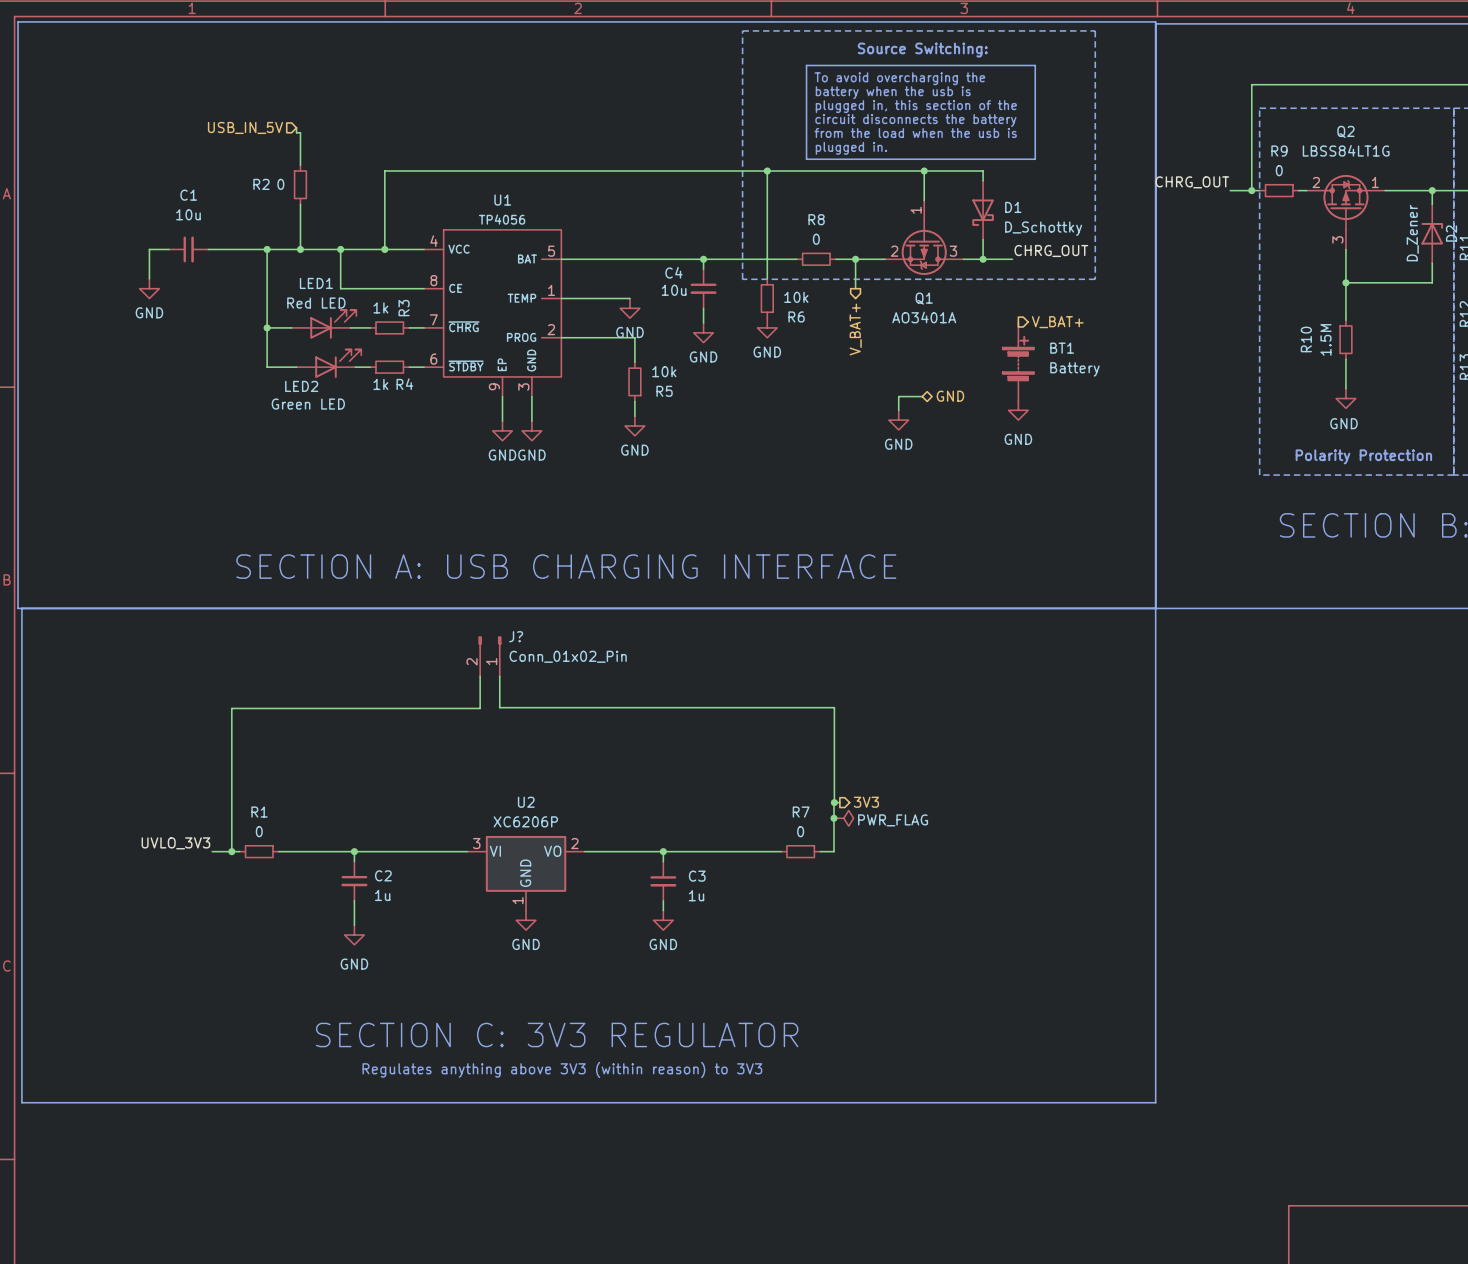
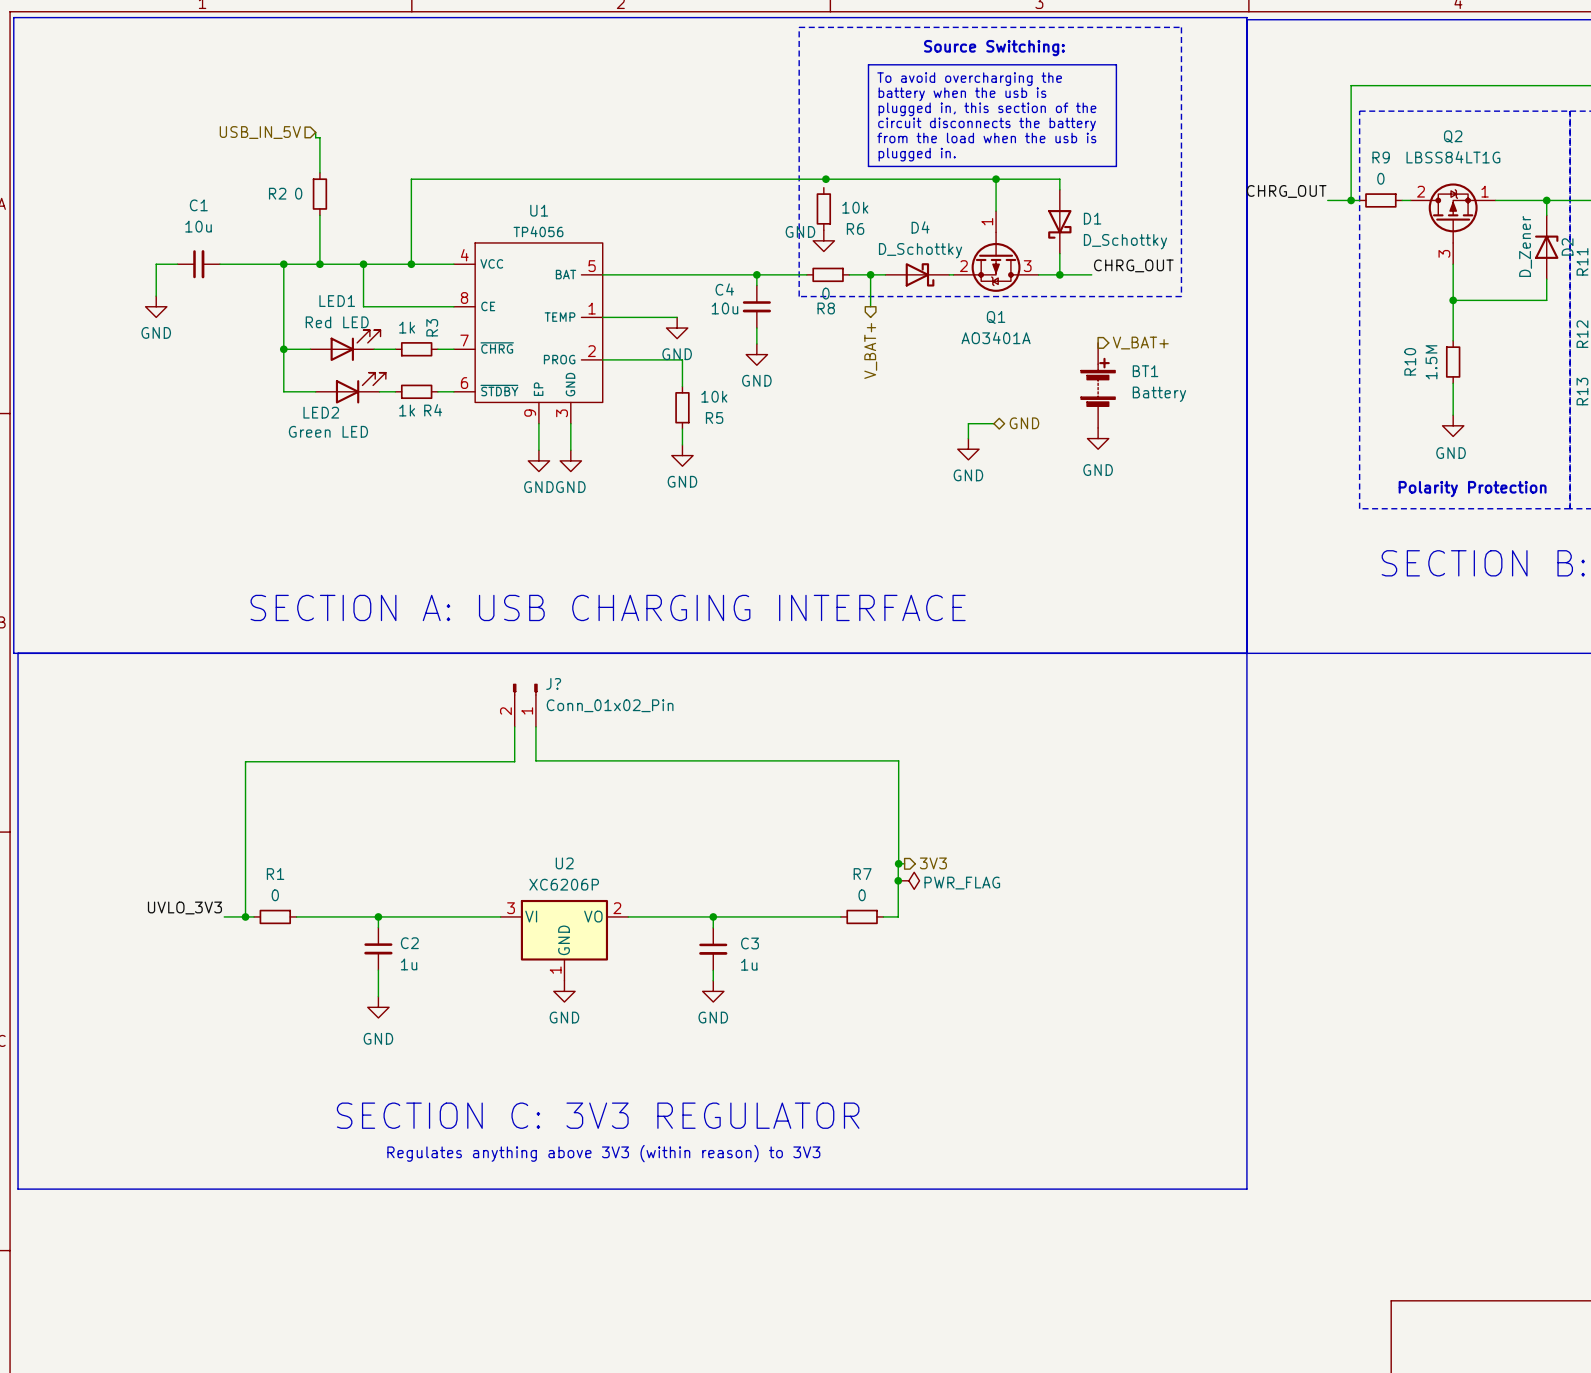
wire: (767, 171) (767, 278) -> none
R8 name position: R8 (816, 219) -> R8 (826, 308)
R8 value position: 0 (816, 239) -> 0 (825, 293)
wire: (749, 259) (788, 259) -> none
wire: none -> (857, 274) (885, 274)
junction: none -> (870, 274)
R8 position: (816, 259) -> (828, 274)
D4: none -> D_Schottky (917, 274)
wire: (855, 259) (855, 288) -> (870, 274) (870, 306)
junction: (855, 259) -> none
R6 position: (767, 298) -> (823, 208)
power symbol position: GND (767, 327) -> GND (823, 240)
hierarchical label position: V_BAT+ (855, 329) -> V_BAT+ (870, 350)
power symbol text position: GND (767, 352) -> GND (800, 231)

